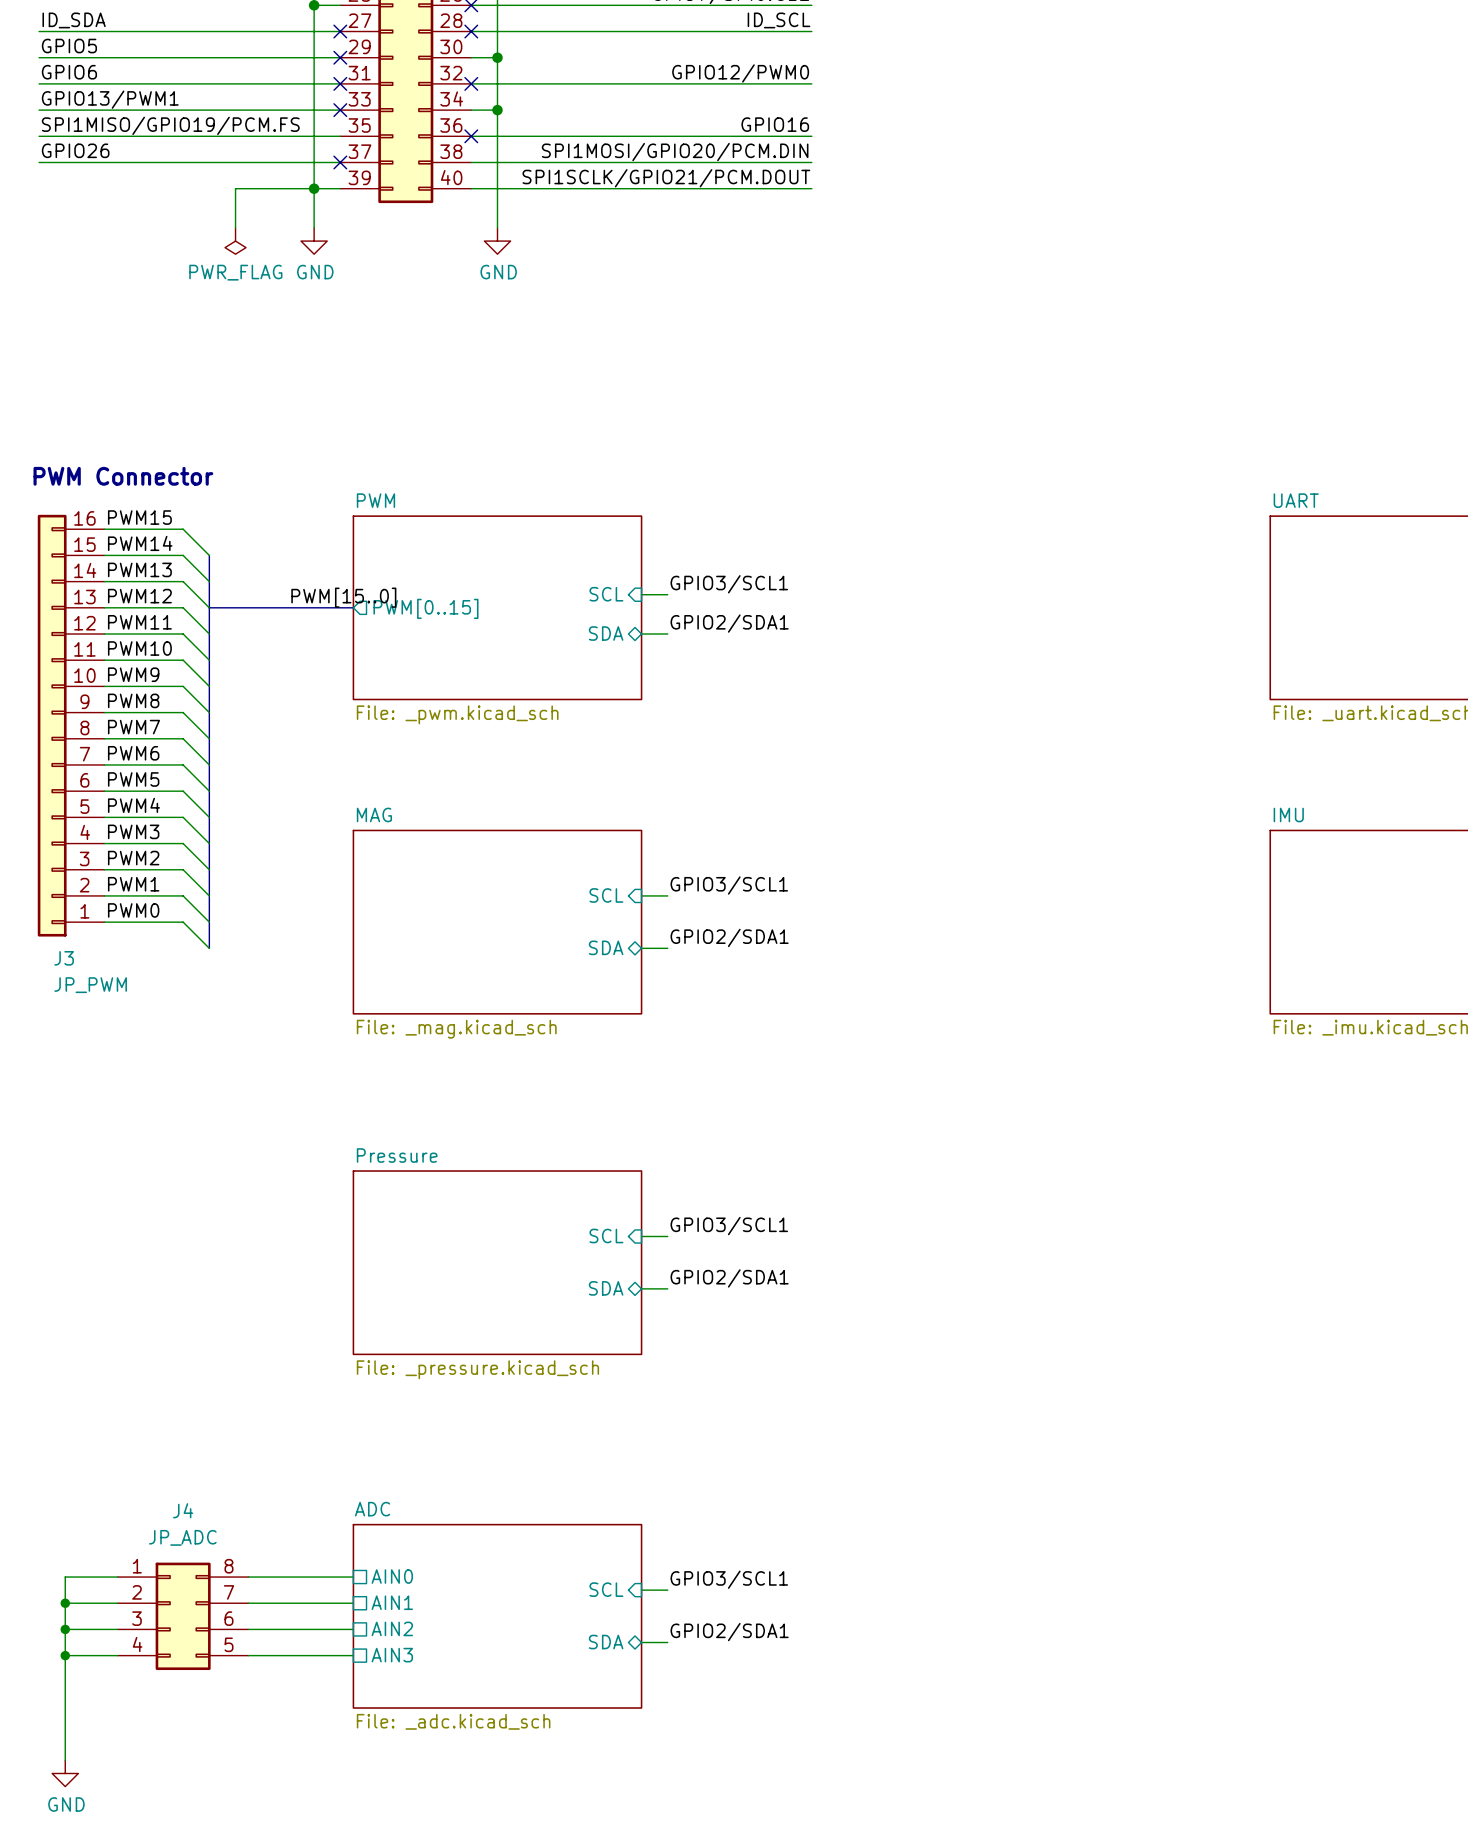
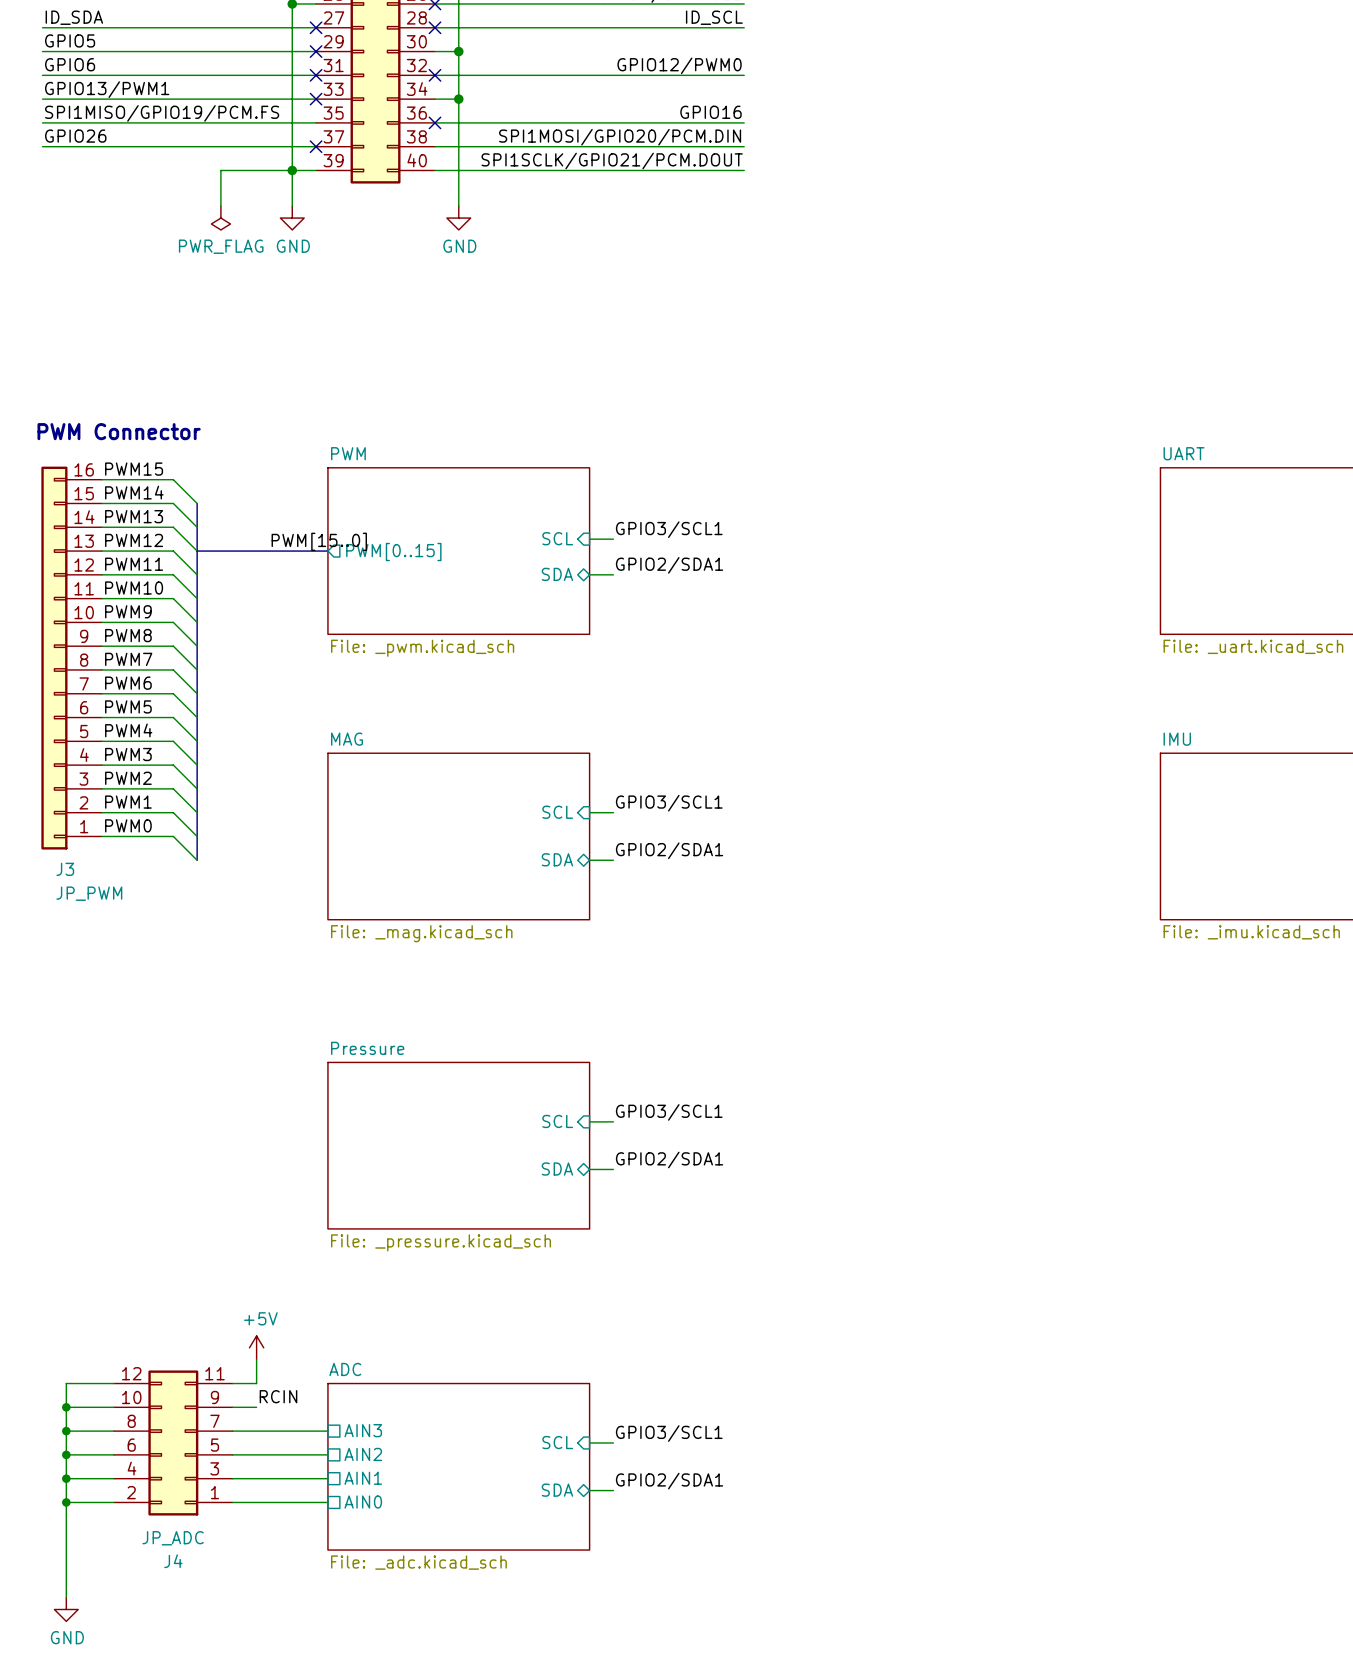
power symbol: none -> +5V (256, 1347)
wire: none -> (256, 1359) (256, 1383) (232, 1383)
J4 name position: J4 (183, 1510) -> J4 (173, 1561)
wire: none -> (113, 1383) (66, 1383) (66, 1431)
J4 value position: JP_ADC (182, 1537) -> JP_ADC (173, 1538)
label: none -> RCIN (278, 1396)
wire: none -> (66, 1407) (113, 1407)
junction: none -> (66, 1407)
wire: none -> (232, 1407) (256, 1407)
J4 symbol: [117, 1562, 249, 1671] -> [113, 1370, 233, 1516]
sheet pin: AIN0 (392, 1576) -> AIN3 (363, 1430)
junction: none -> (66, 1431)
sheet pin: AIN1 (392, 1602) -> AIN2 (363, 1454)
sheet pin: AIN2 (392, 1628) -> AIN1 (363, 1478)
sheet pin: AIN3 (392, 1655) -> AIN0 (363, 1502)

